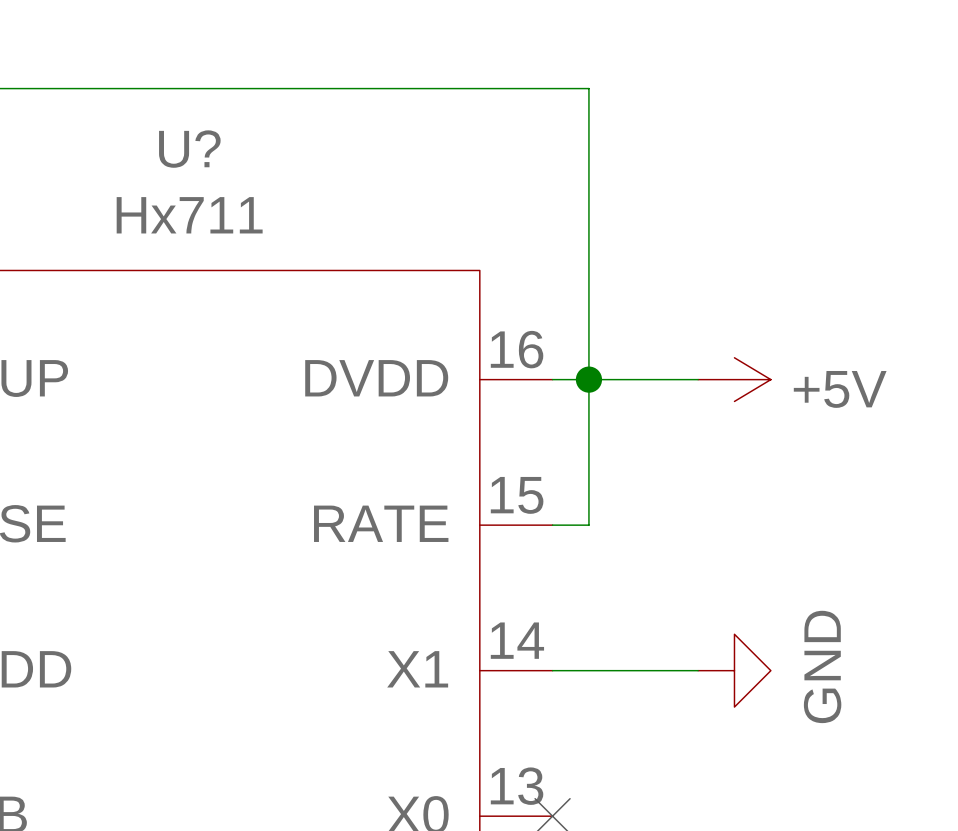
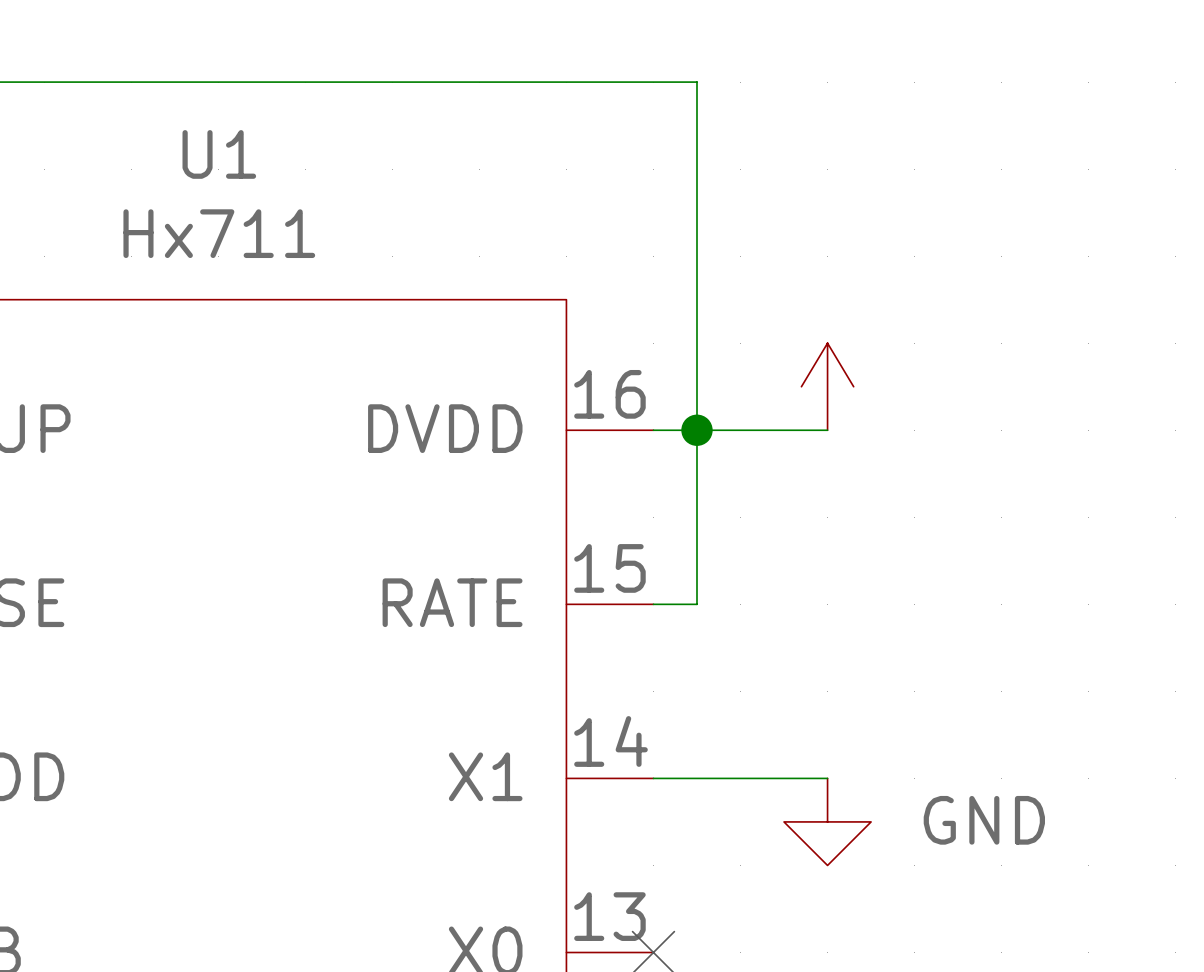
U? name: U? (189, 149) -> U1 (219, 154)
power symbol: none -> (827, 386)
power symbol: +5V (734, 379) -> none
power symbol rotation: 0° (734, 670) -> 90° clockwise (827, 821)
power symbol position: GND (734, 670) -> GND (827, 821)

